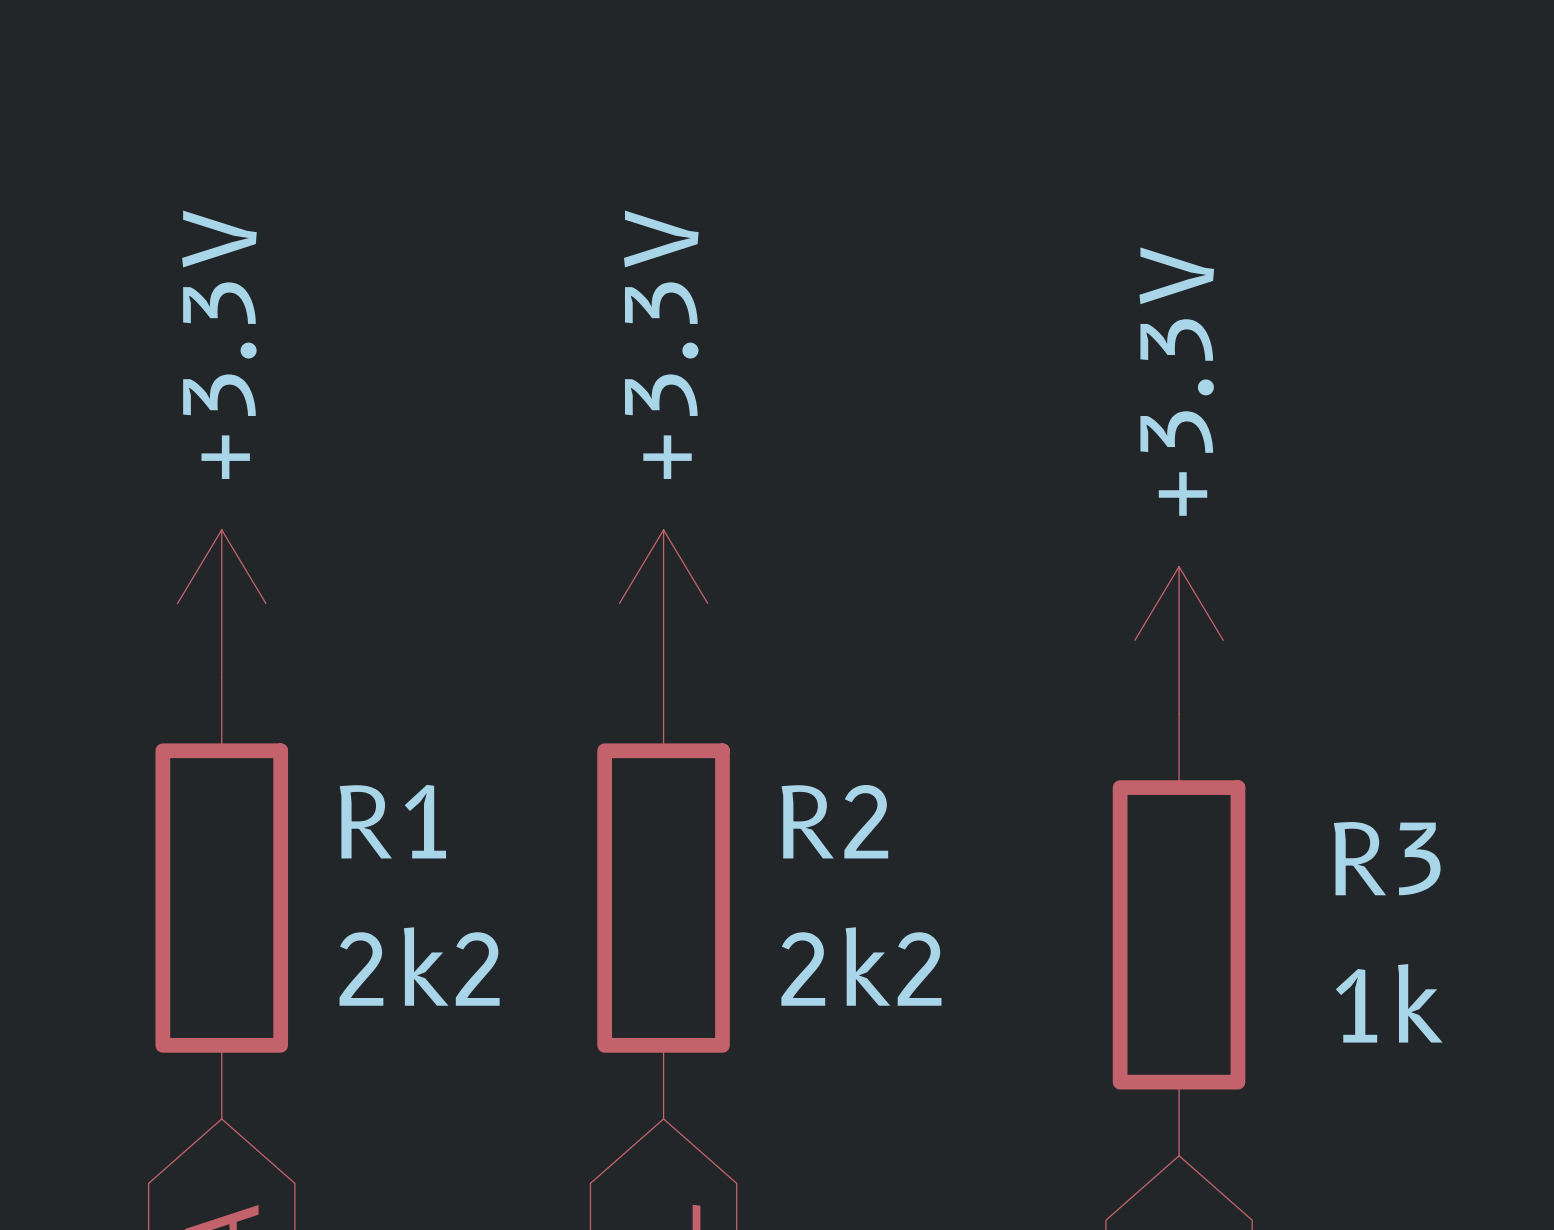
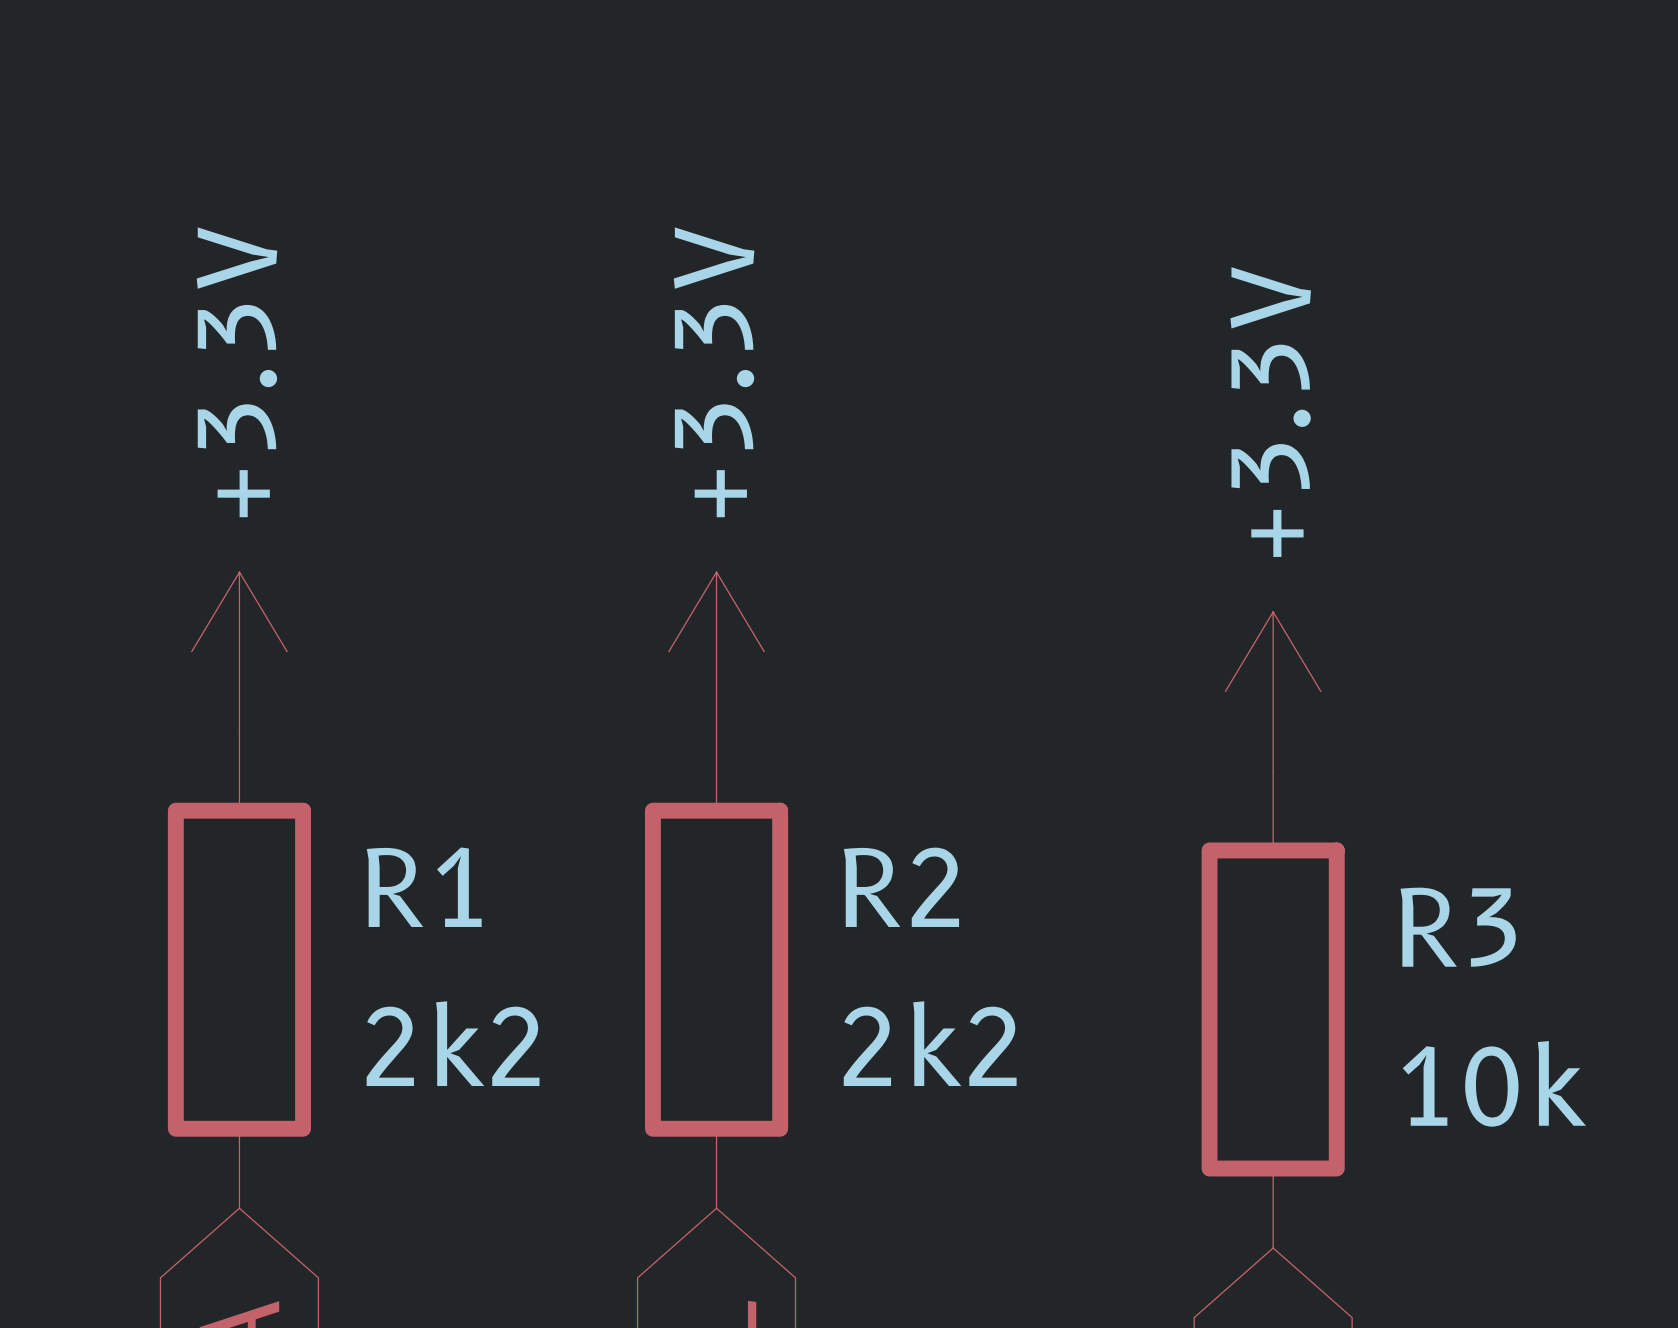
R3 name position: R3 (1387, 858) -> R3 (1458, 927)
R3 value: 1k (1389, 1003) -> 10k (1494, 1083)

